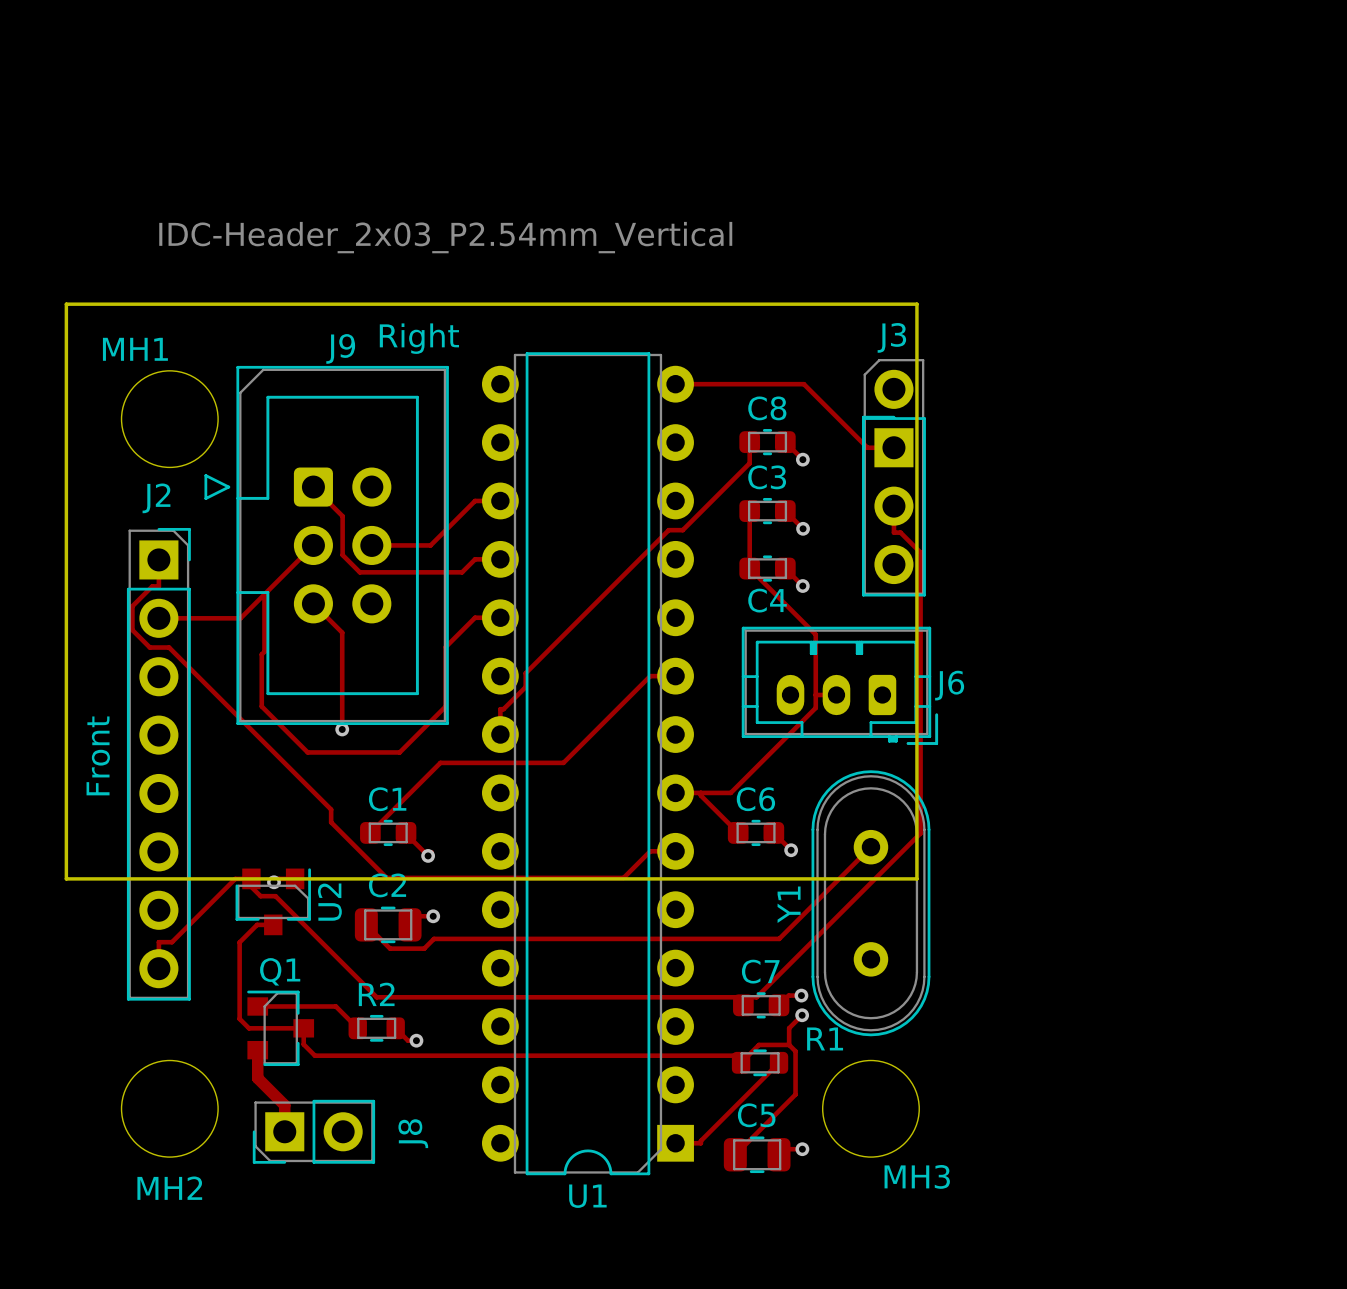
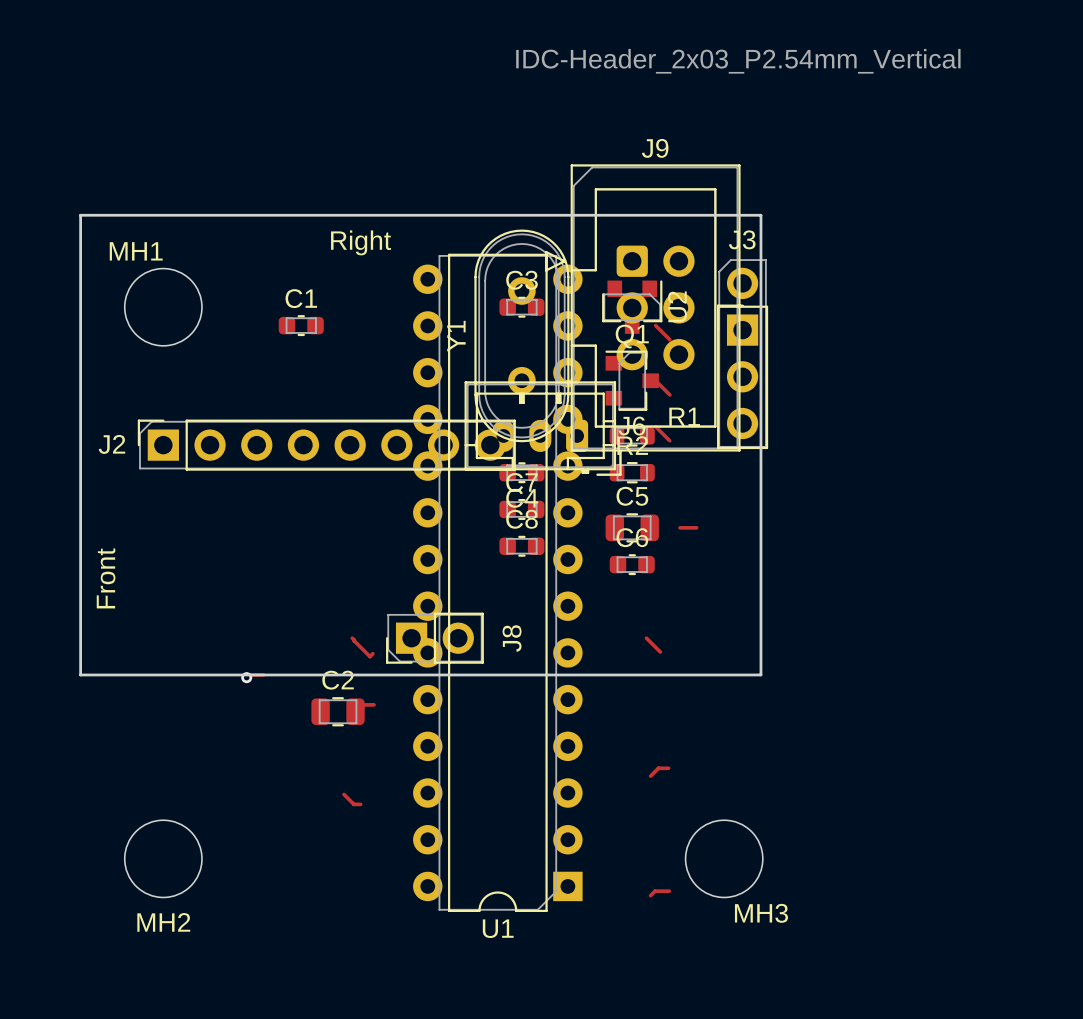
track: (675, 384) (803, 384) (867, 447) (893, 447) -> none
track: (749, 442) (749, 463) (682, 530) (668, 530) (525, 673) (525, 687) (503, 709) (500, 709) (500, 734) -> none
C8 position: (767, 442) -> (521, 546)
via: (802, 459) -> none
track: (313, 487) (342, 516) (342, 555) (359, 572) (462, 572) (475, 559) (500, 559) -> none
track: (500, 500) (475, 500) (430, 545) (371, 545) -> none
track: (893, 506) (893, 532) (900, 532) (920, 552) (920, 833) (756, 997) (376, 997) (275, 896) (260, 896) (243, 878) -> none
track: (749, 511) (749, 568) (815, 634) (815, 707) (730, 792) (675, 792) -> none
C3 position: (767, 511) -> (521, 307)
via: (803, 528) -> none
track: (313, 545) (240, 618) (158, 618) -> none
J9 position: (326, 545) -> (642, 307)
track: (158, 559) (158, 586) (152, 586) (132, 606) (132, 630) (149, 647) (169, 647) (331, 809) (331, 822) (386, 877) (623, 877) (650, 851) (675, 851) -> none
C4 position: (767, 568) -> (521, 472)
via: (802, 586) -> none
track: (264, 594) (261, 706) (307, 752) (399, 752) (445, 706) (445, 647) (475, 617) (500, 617) -> none
track: (313, 603) (342, 632) (342, 729) -> none
track: (675, 676) (650, 676) (563, 762) (440, 762) (370, 832) -> none
J6 position: (839, 685) -> (543, 428)
via: (342, 729) -> none
J2 rotation: 0° (158, 764) -> 90° counterclockwise (326, 445)
track: (700, 792) (700, 795) (738, 832) -> none
C1 position: (388, 832) -> (301, 325)
C6 position: (756, 832) -> (632, 564)
track: (870, 847) (779, 938) (433, 938) (424, 948) (390, 948) (366, 924) -> none
via: (791, 850) -> none
via: (428, 855) -> none
track: (251, 878) (235, 878) (171, 942) (158, 942) (158, 968) -> none
U2 position: (273, 901) -> (632, 307)
Y1 position: (870, 903) -> (521, 335)
via: (433, 916) -> none
track: (273, 924) (257, 924) (239, 942) (239, 1018) (249, 1028) (303, 1028) (303, 1044) (314, 1055) (733, 1055) (741, 1062) (758, 1044) (789, 1044) -> none
via: (801, 995) -> none
C7 position: (761, 1005) -> (521, 509)
track: (257, 1006) (335, 1006) (357, 1028) -> none
track: (802, 1015) (789, 1028) (789, 1044) -> none
via: (802, 1015) -> none
Q1 position: (280, 1028) -> (632, 380)
R2 position: (376, 1028) -> (632, 472)
via: (416, 1040) -> none
track: (789, 1044) (795, 1051) (795, 1094) (735, 1154) -> none
track: (257, 1050) (257, 1078) (284, 1105) (284, 1131) -> none
R1 position: (760, 1062) -> (632, 435)
track: (779, 1062) (700, 1140) (700, 1143) (675, 1143) -> none
J8 position: (313, 1131) -> (434, 638)
via: (802, 1149) -> none
C5 position: (757, 1154) -> (632, 527)

